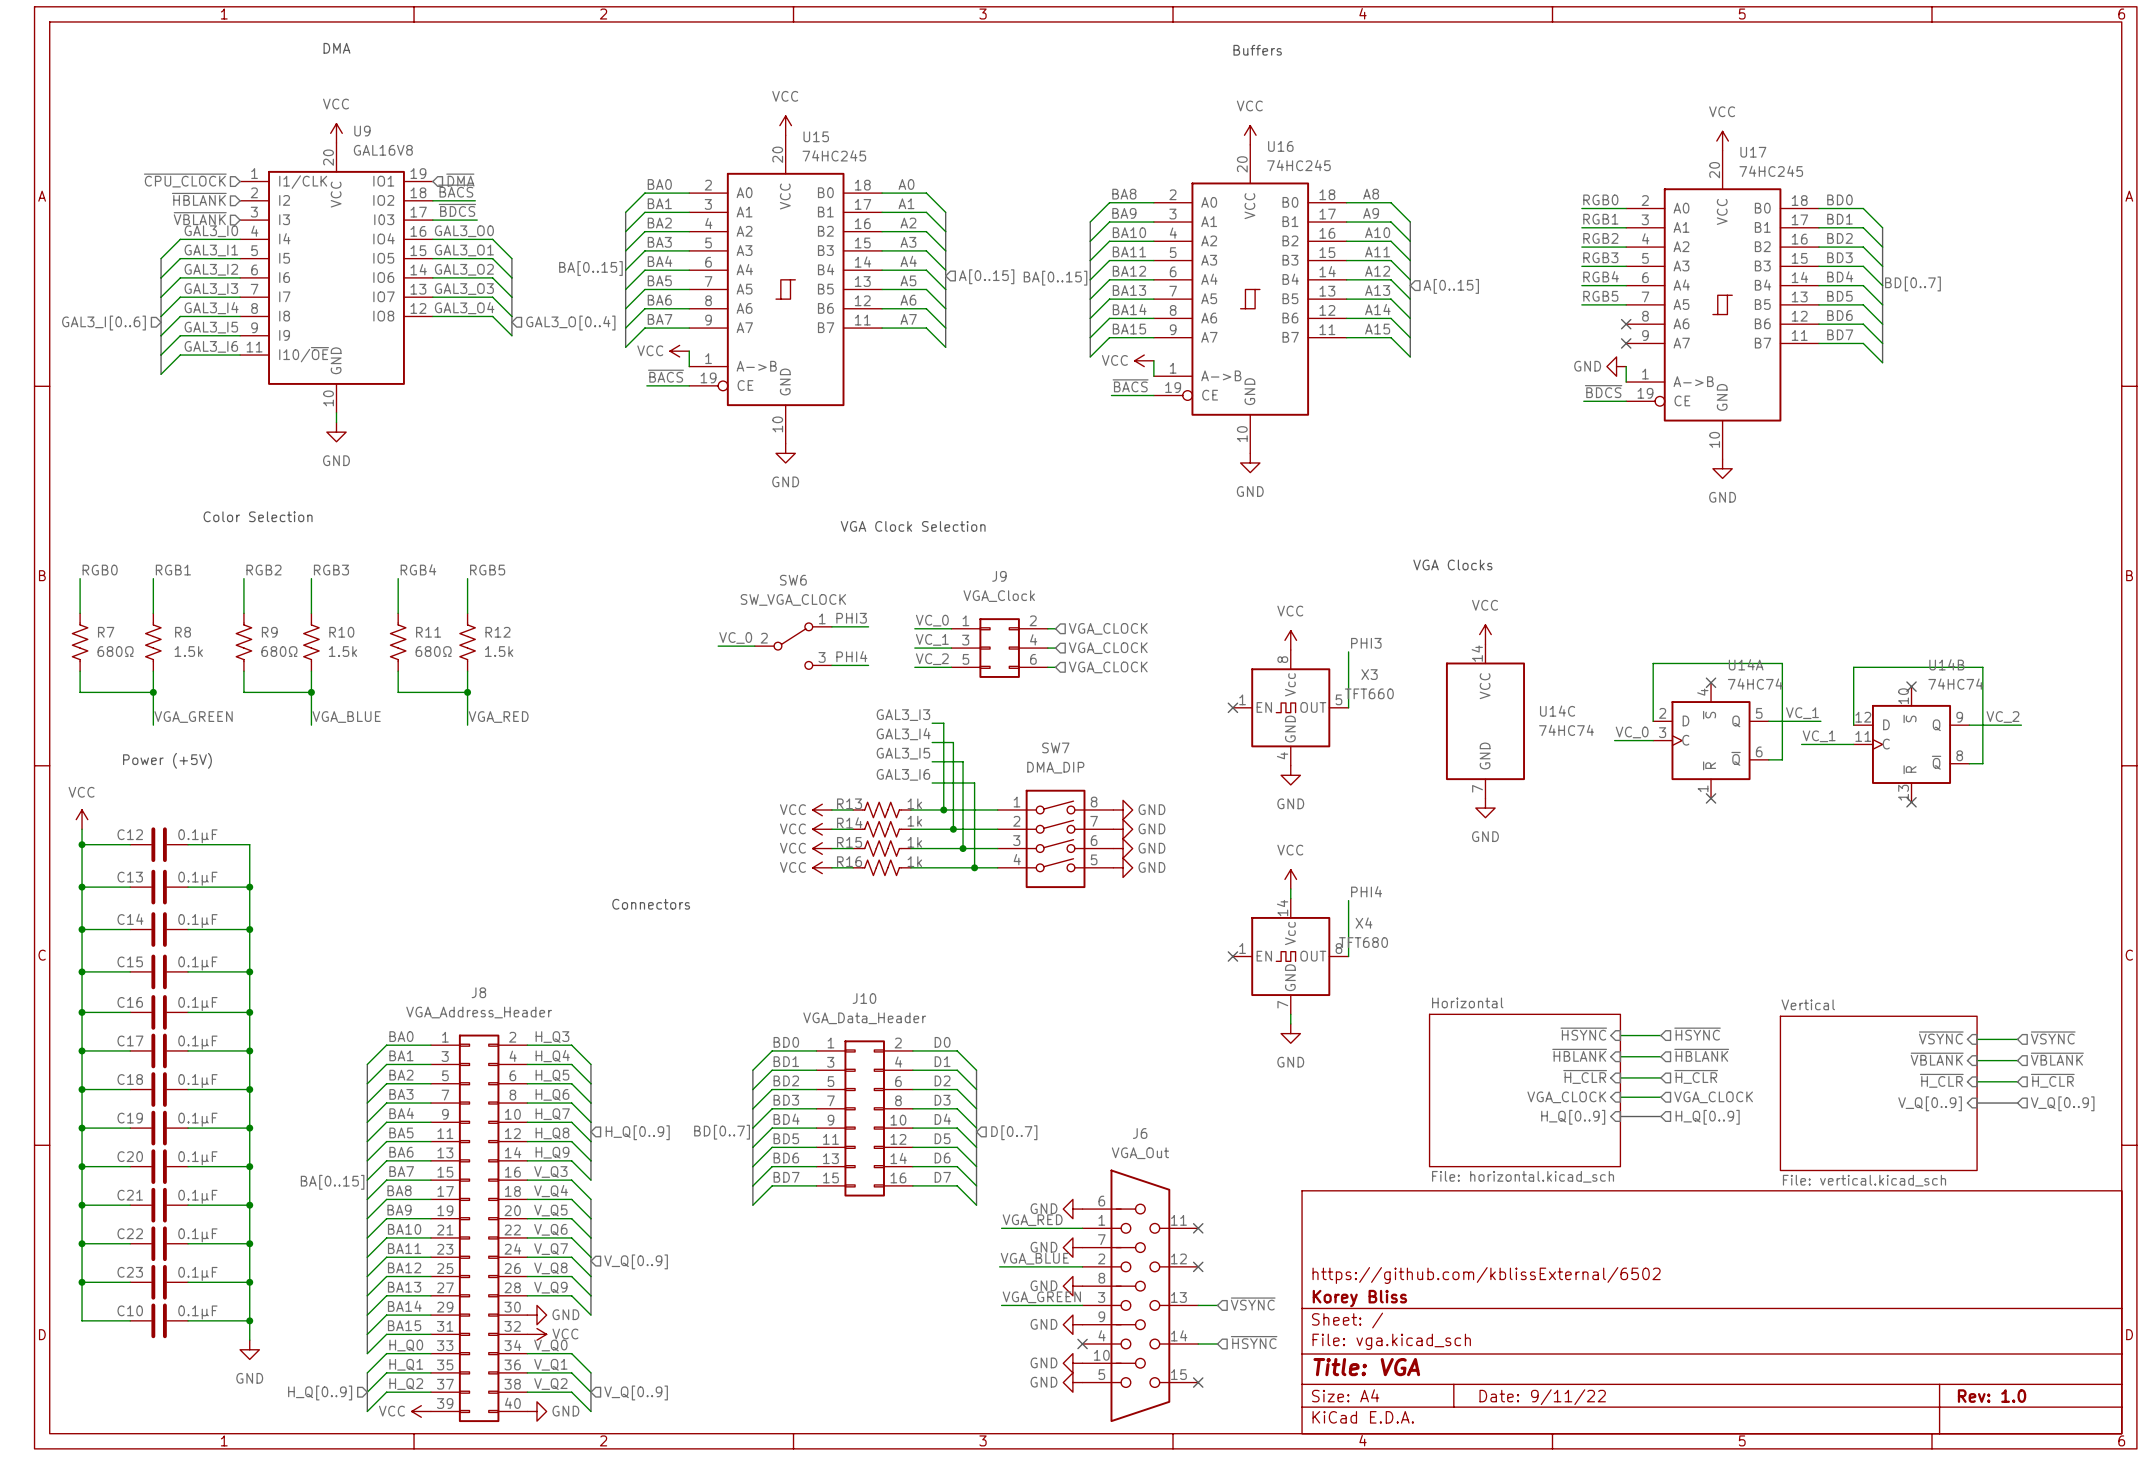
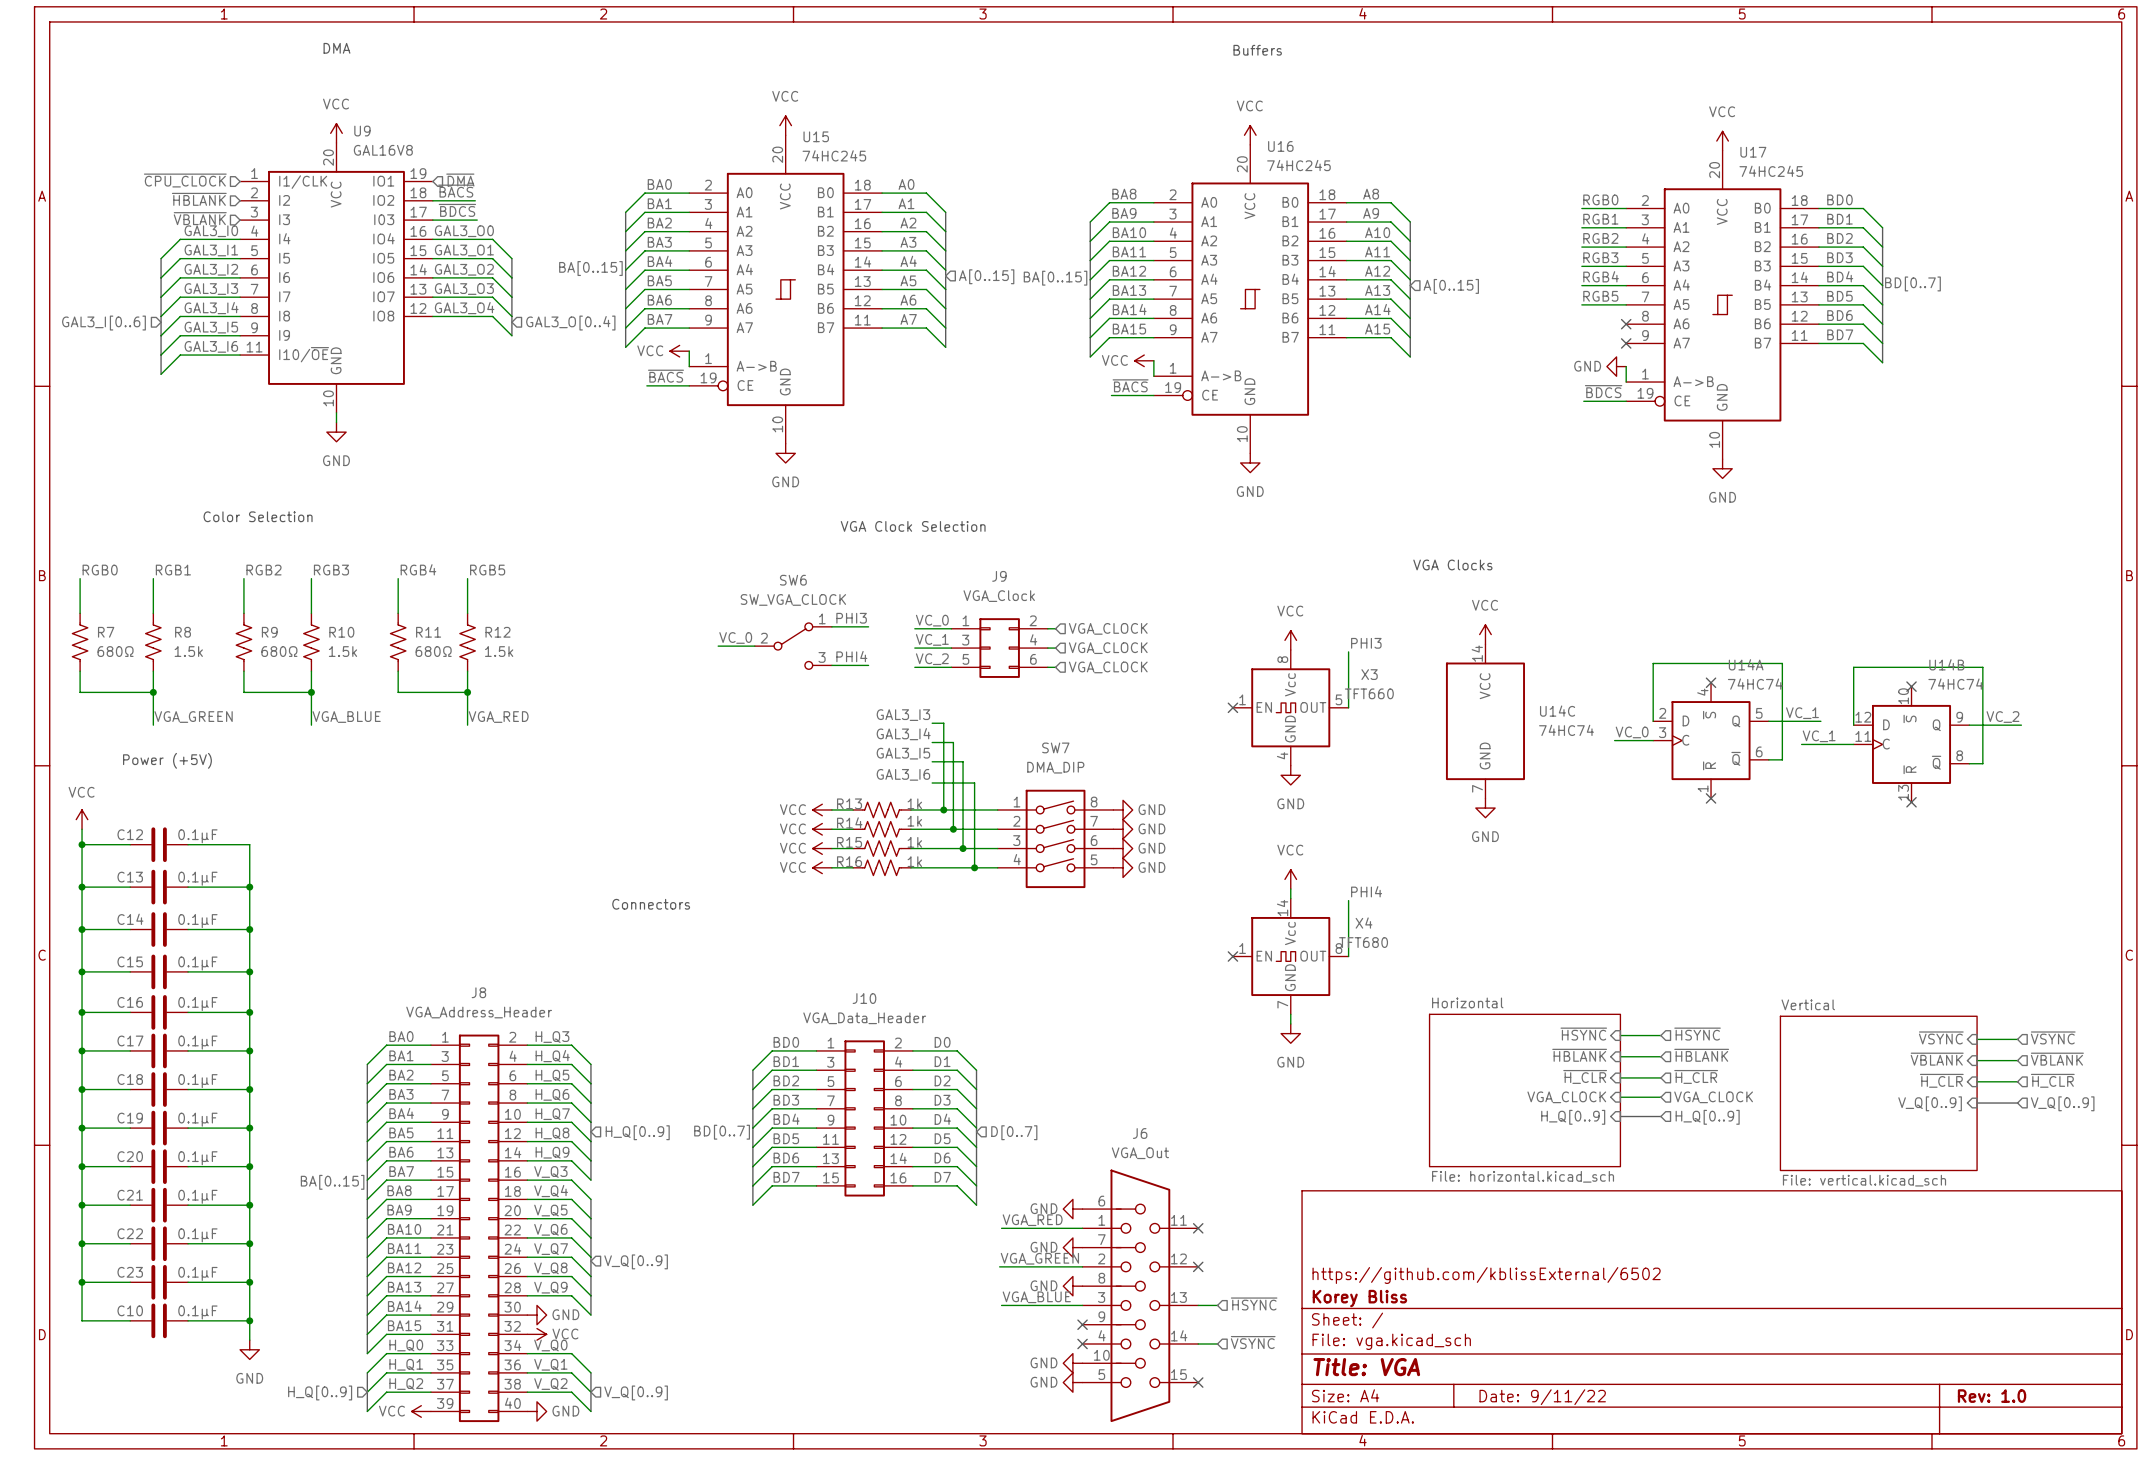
label: VGA_BLUE (1034, 1258) -> VGA_GREEN (1039, 1258)
label: VGA_GREEN (1041, 1297) -> VGA_BLUE (1036, 1297)
hierarchical label: ~{VSYNC} (1253, 1303) -> ~{HSYNC} (1254, 1303)
power symbol: GND (1072, 1324) -> none
no-connect mark: none -> (1082, 1324)
hierarchical label: ~{HSYNC} (1254, 1342) -> ~{VSYNC} (1253, 1342)

